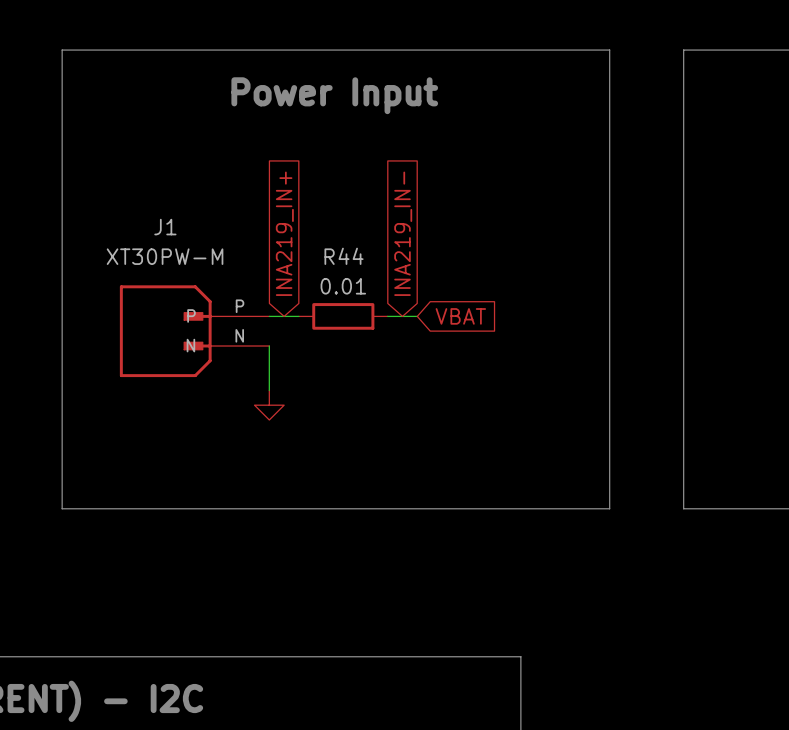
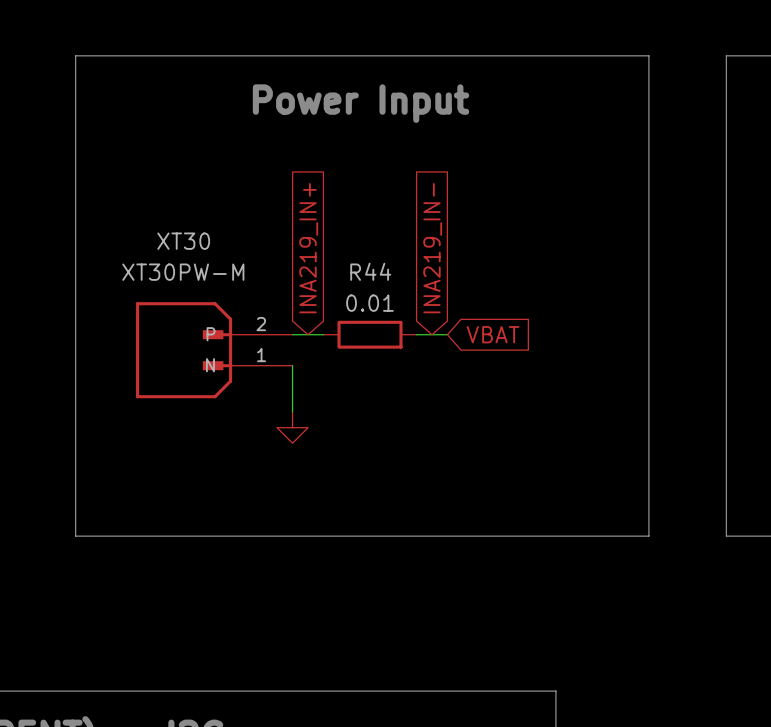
J1 name: J1 (165, 227) -> XT30 (183, 241)
J1 pin number: P (240, 306) -> 2 (261, 324)
J1 pin number: N (239, 335) -> 1 (261, 355)

